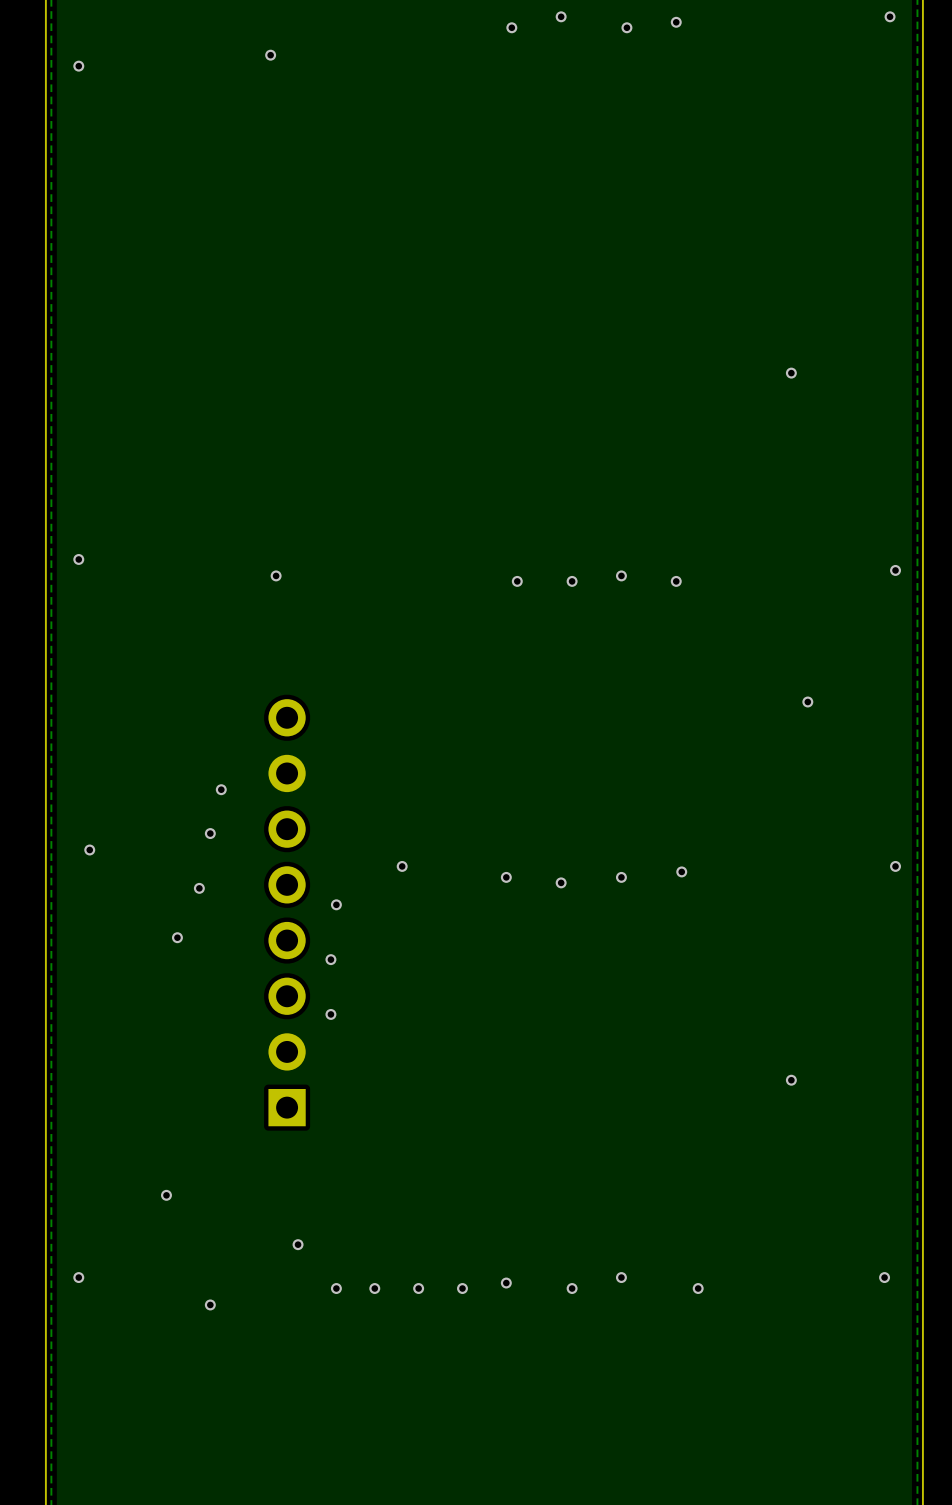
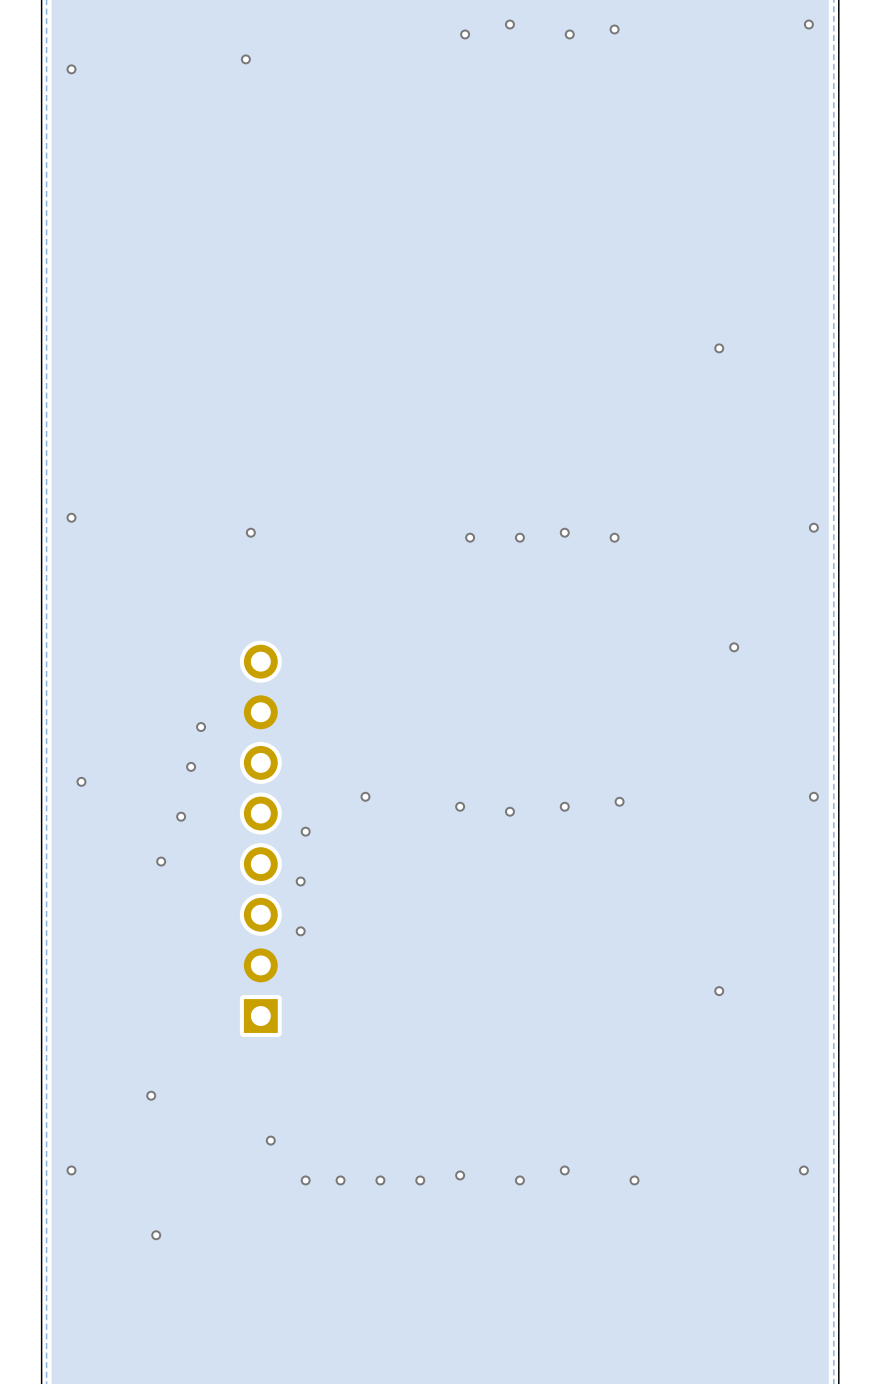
via position: (210, 1304) -> (156, 1235)

